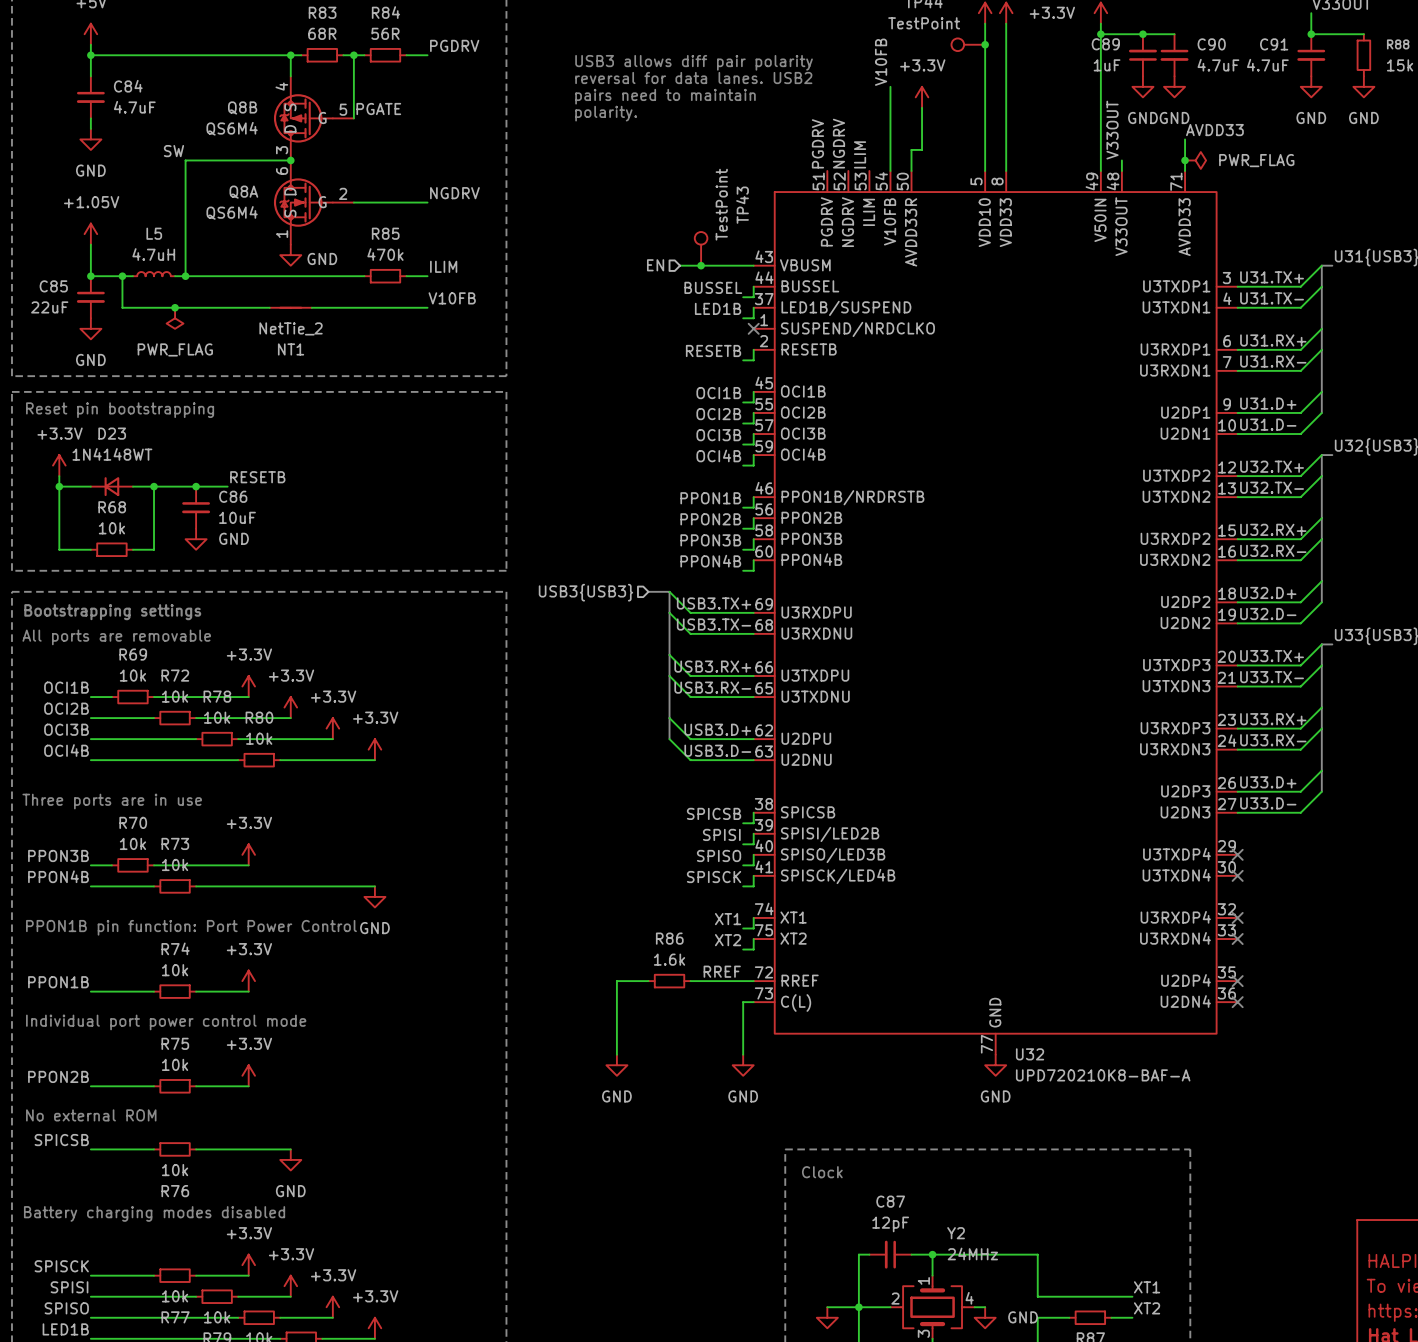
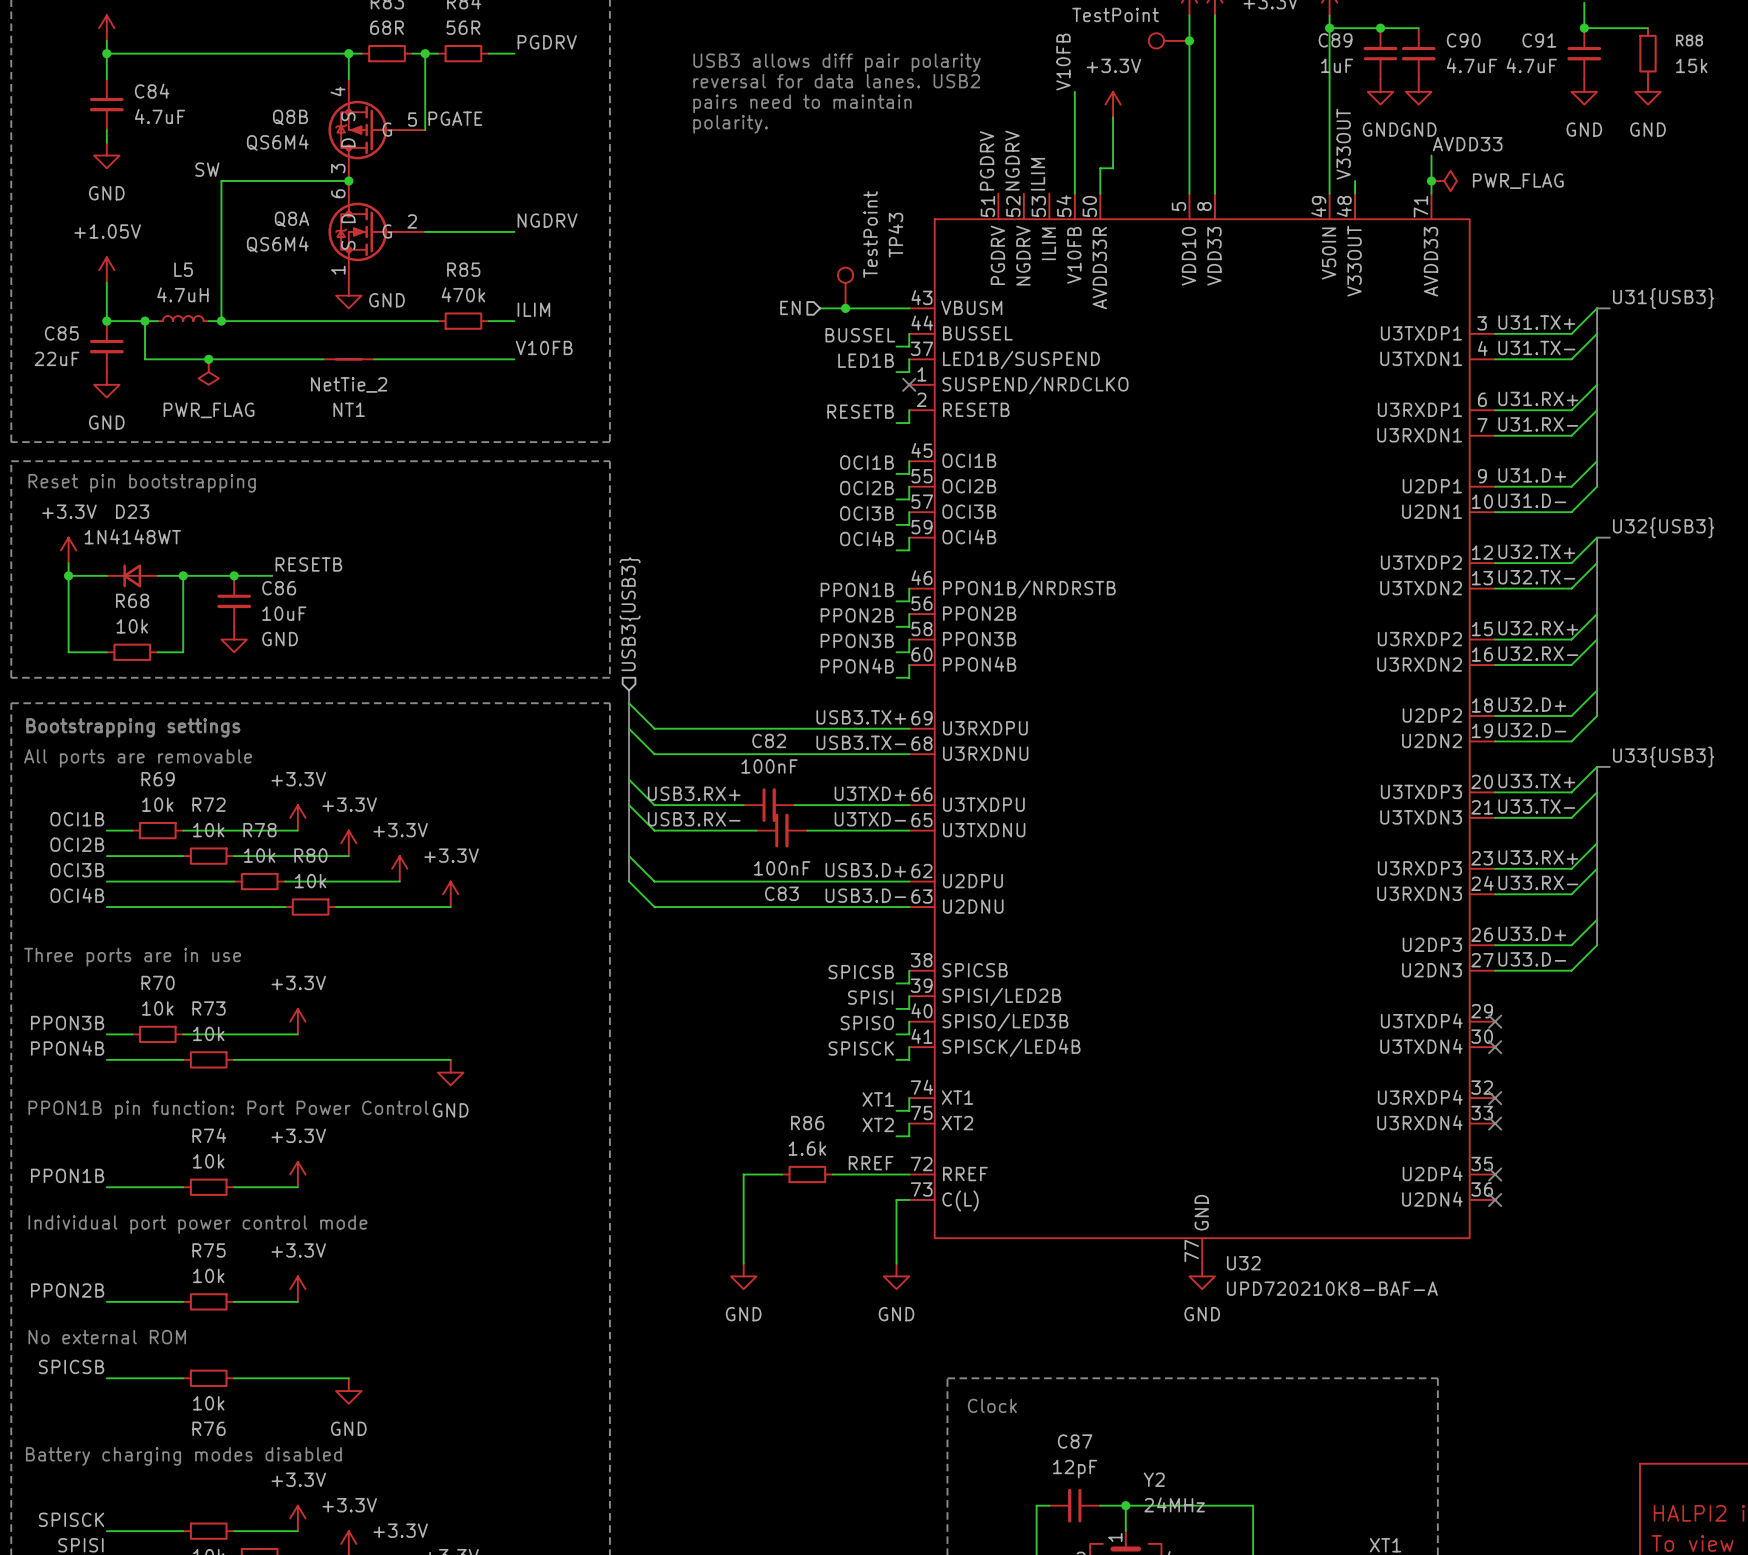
bus: none -> (629, 690) (629, 881)
bus: (648, 591) (669, 591) (669, 739) -> none
wire: (669, 591) (690, 612) -> (629, 703) (654, 728) (832, 728)
hierarchical label rotation: 0° (585, 592) -> 90° clockwise (630, 614)
wire: (669, 612) (690, 633) -> (629, 728) (654, 754) (832, 754)
wire: none -> (629, 779) (654, 805) (743, 805)
wire: (669, 654) (690, 675) -> (794, 805) (832, 805)
label: none -> USB3.RX+ (694, 793)
label: USB3.RX+ (712, 666) -> U3TXD+ (870, 793)
wire: none -> (629, 805) (654, 830) (756, 830)
C82: none -> 100nF (769, 805)
wire: (669, 675) (690, 697) -> (807, 830) (832, 830)
label: none -> USB3.RX- (694, 819)
label: USB3.RX- (712, 687) -> U3TXD- (870, 819)
C83: none -> 100nF (781, 830)
wire: (669, 718) (690, 739) -> (629, 856) (654, 881) (832, 881)
wire: (669, 739) (690, 760) -> (629, 881) (654, 907) (832, 907)

